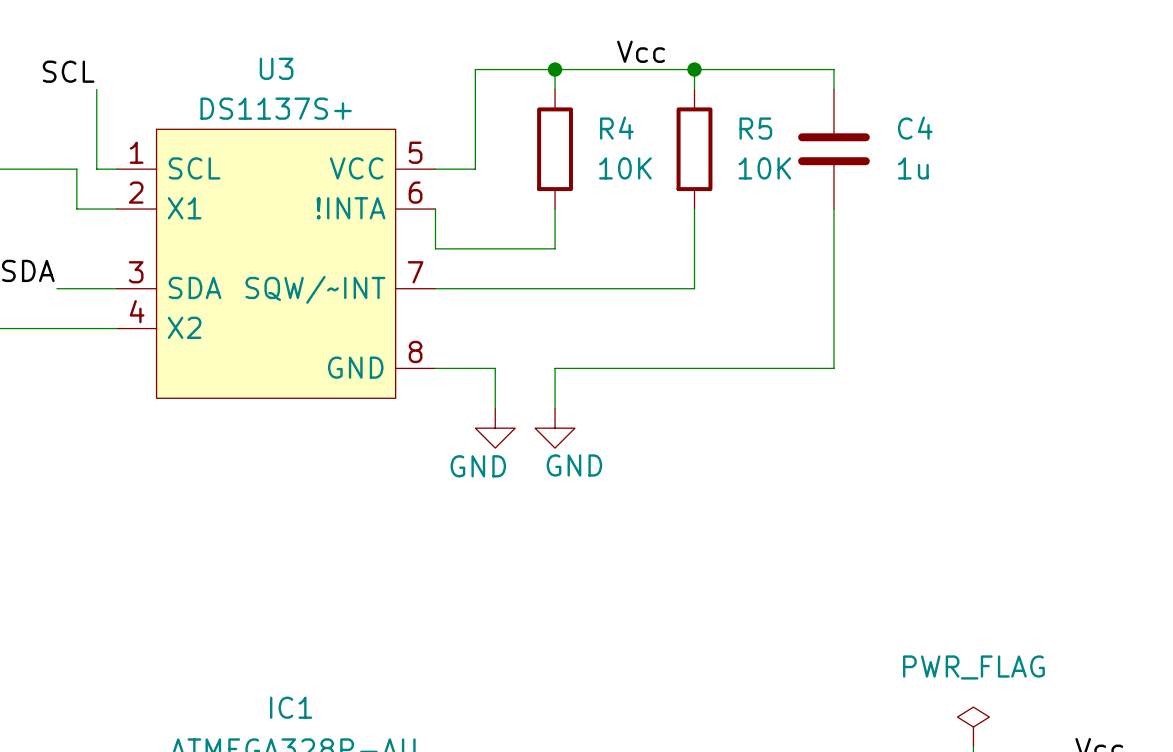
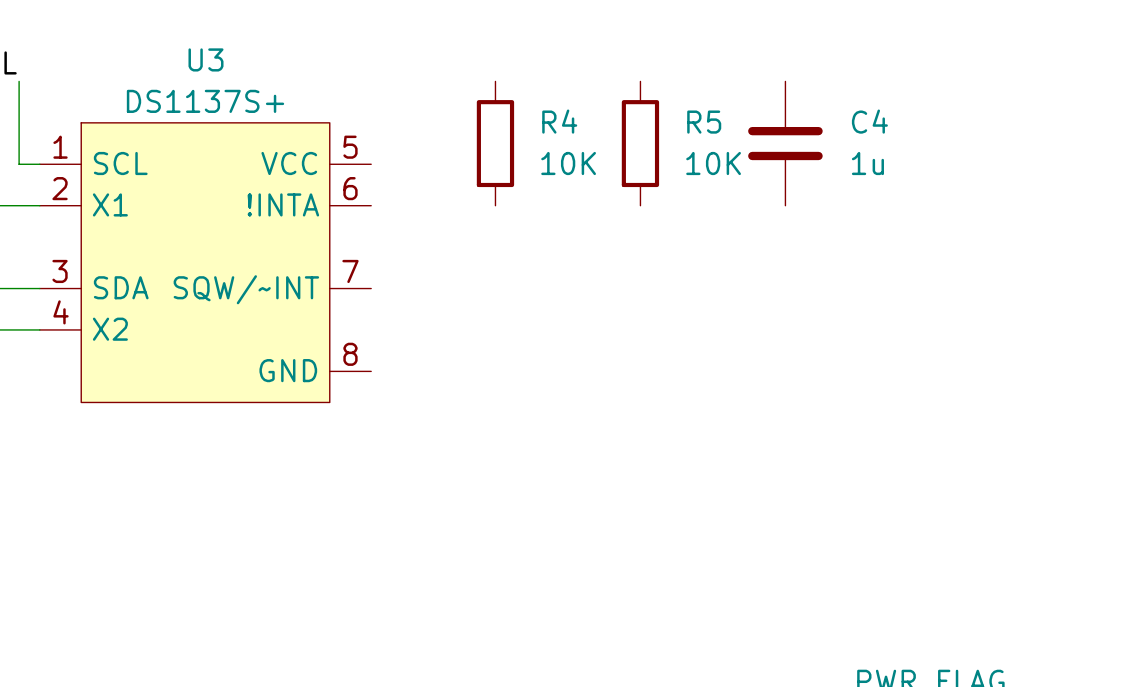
label: Vcc (641, 51) -> none
wire: (555, 69) (555, 89) -> none
junction: (555, 69) -> none
wire: (694, 69) (694, 89) -> none
junction: (694, 69) -> none
wire: (833, 89) (833, 69) (475, 69) (475, 169) (435, 169) -> none
wire: (435, 209) (435, 248) (555, 248) (555, 209) -> none
wire: (694, 209) (694, 288) (435, 288) -> none
wire: (833, 209) (833, 368) (555, 368) (555, 408) -> none
wire: (435, 368) (495, 368) (495, 408) -> none
power symbol: GND (495, 428) -> none
power symbol: GND (555, 428) -> none

